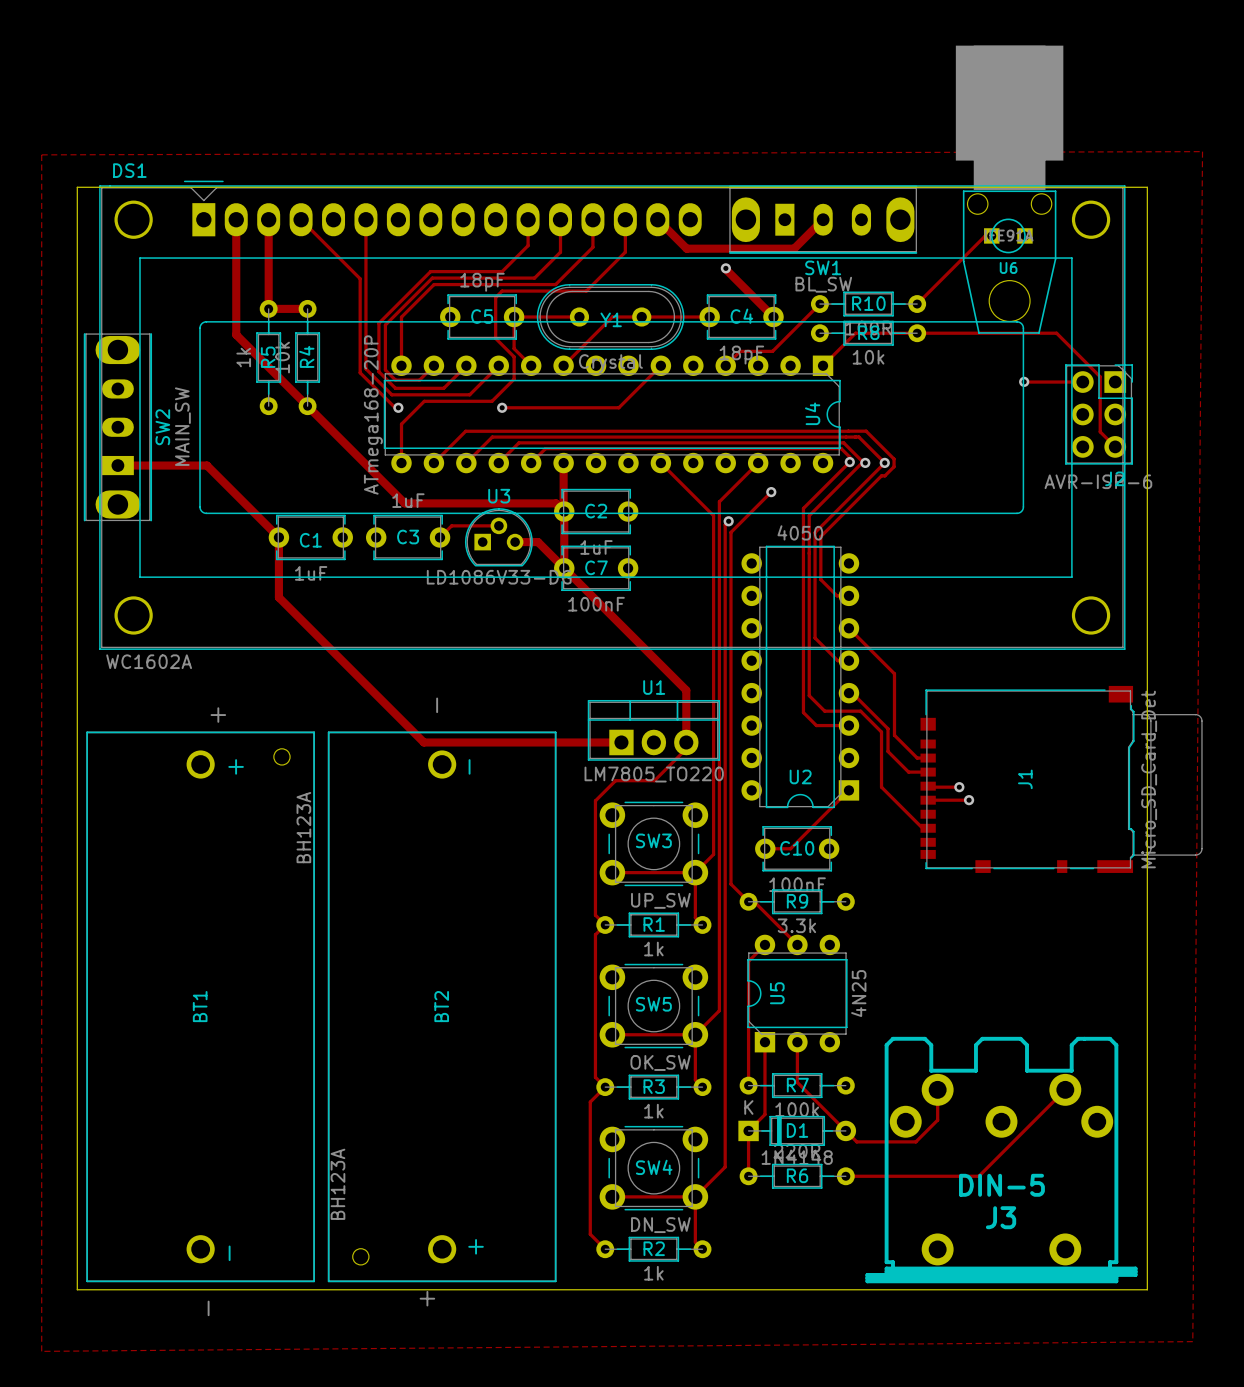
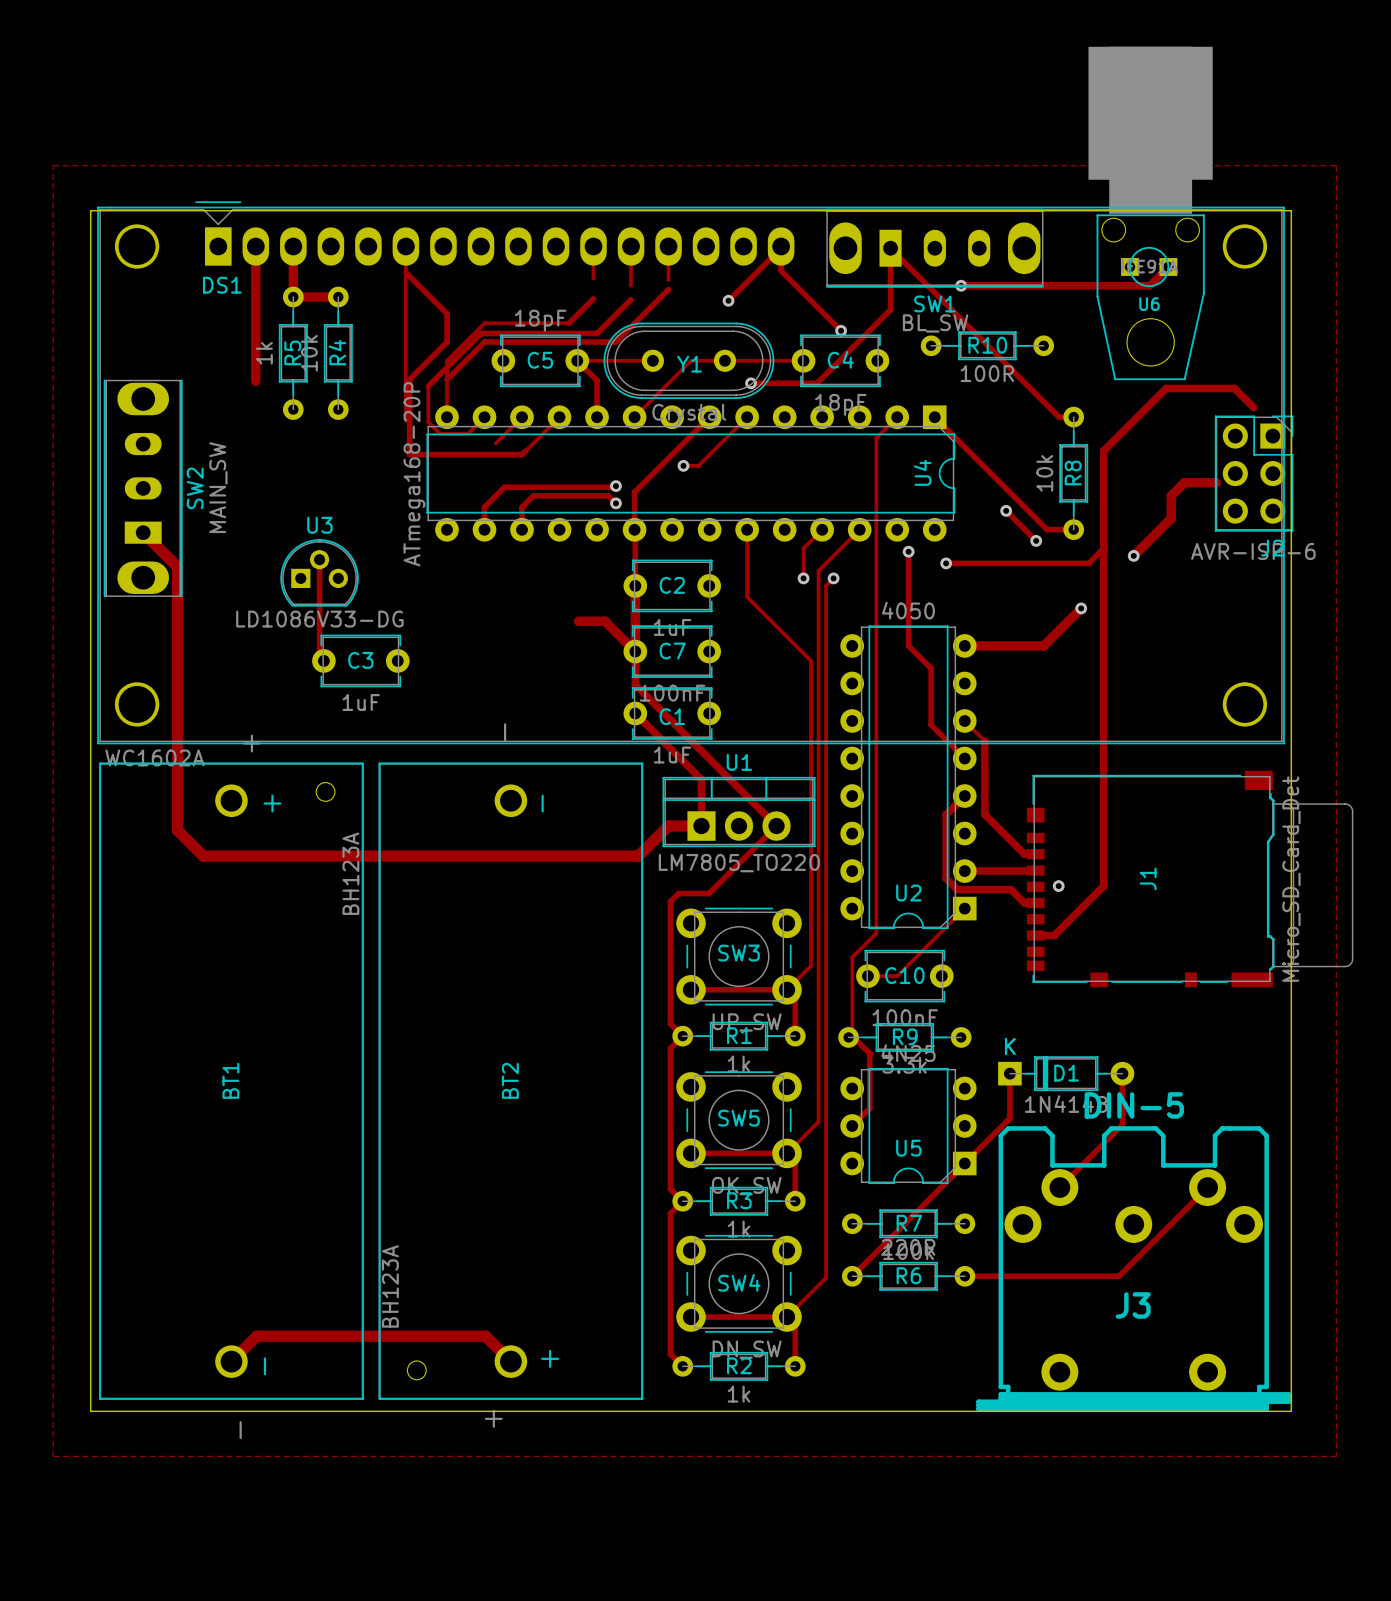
zone outline: (1202, 151) (41, 154) (41, 1351) (1192, 1341) (1202, 151) -> (53, 165) (53, 1456) (1336, 1456) (1336, 165) (53, 165)
DS1 name position: DS1 (129, 170) -> DS1 (222, 285)
DS1 footprint: [99, 180, 1126, 650] -> [97, 201, 1285, 745]
board edge: (93, 187) (77, 187) (77, 1289) (1147, 1289) (1147, 187) (1131, 187) -> (90, 210) (90, 1411) (1291, 1411) (1291, 210)
track: none -> (781, 246) (781, 270) (841, 330)
track: (301, 219) (360, 278) (360, 372) (395, 407) (398, 407) -> none
track: (625, 219) (625, 252) (586, 291) (502, 291) (495, 297) (495, 338) (514, 356) (514, 379) (492, 401) (424, 401) (401, 424) (401, 463) -> none
track: (657, 219) (686, 248) (794, 248) (823, 219) -> none
track: none -> (781, 248) (728, 300)
track: none -> (890, 248) (890, 309) (817, 383) (751, 383)
track: none -> (890, 248) (1059, 417) (1073, 417)
track: (991, 235) (985, 235) (917, 304) -> none
track: none -> (1168, 266) (1149, 285) (961, 285)
track: (528, 245) (502, 271) (430, 271) (378, 323) (378, 371) (395, 388) (443, 388) -> none
track: (592, 247) (555, 284) (507, 284) -> (593, 298) (569, 323)
track: (560, 252) (534, 278) (432, 278) (385, 325) (385, 338) -> (631, 299) (597, 333) (481, 333) (428, 386)
via: none -> (961, 285)
track: none -> (668, 289) (615, 342) (484, 342) (446, 379)
track: (268, 261) (268, 308) (307, 308) -> (293, 297) (338, 297)
via: none -> (728, 300)
track: (725, 268) (773, 317) -> none
via position: (725, 268) -> (841, 330)
track: (819, 304) (772, 351) (740, 351) (725, 365) -> none
track: (514, 317) (514, 348) (531, 365) -> (577, 360) (597, 380) (597, 417)
R8 rotation: 0° (868, 333) -> 90° clockwise (1073, 473)
R8 position: (868, 333) -> (1073, 473)
track: (236, 334) (404, 503) (556, 503) (564, 511) (563, 463) -> none
via: none -> (751, 383)
R5 position: (268, 357) -> (293, 353)
R4 position: (307, 357) -> (338, 353)
track: none -> (1253, 407) (1234, 388) (1166, 388) (1103, 450) (1103, 886) (1054, 935) (1035, 935)
track: none -> (709, 417) (634, 492) (635, 585)
track: none -> (897, 417) (876, 438) (876, 933) (852, 957) (852, 1036) (869, 1053) (869, 1108) (852, 1125)
track: (823, 365) (855, 333) (1056, 333) (1100, 376) (1100, 431) (1115, 446) -> (934, 417) (1047, 529) (1073, 529)
track: (365, 368) (391, 394) (469, 394) -> (405, 272) (447, 313) (447, 342) (409, 379) (409, 454) (522, 454) (525, 450)
track: (1024, 381) (1082, 382) -> none
via: (1024, 381) -> none
via: (398, 407) -> none
track: (502, 407) (605, 407) -> none
via: (502, 407) -> none
via: none -> (683, 465)
track: none -> (1216, 482) (1184, 482) (1171, 495) (1171, 518) (1133, 555)
via: none -> (615, 486)
SW2 position: (117, 427) -> (143, 488)
track: (848, 431) (465, 431) (433, 463) -> (615, 486) (504, 487) (484, 507) (484, 529)
track: (848, 431) (866, 431) (894, 459) (894, 466) (884, 475) (881, 475) (820, 536) (820, 579) (837, 595) (848, 595) -> none
track: (855, 436) (858, 436) (884, 462) (815, 532) (815, 638) (837, 660) (848, 660) -> (908, 551) (908, 645) (931, 668) (931, 724) (964, 758)
track: (855, 437) (492, 437) (466, 463) -> (615, 503) (608, 495) (533, 495) (522, 507) (522, 529)
via: none -> (615, 503)
track: none -> (1006, 510) (1036, 540)
via: none -> (1006, 510)
via: (849, 462) -> none
track: (863, 462) (843, 442) (518, 442) (498, 463) -> none
track: (865, 462) (862, 462) (809, 515) (809, 695) (824, 711) (860, 711) (881, 732) (881, 787) (922, 828) (928, 828) -> none
via: (865, 462) -> none
via: (884, 462) -> none
track: (531, 463) (545, 448) (841, 448) (849, 457) (849, 462) (803, 508) (803, 712) (816, 725) (848, 725) -> none
track: (660, 463) (713, 515) (713, 854) (695, 872) -> (747, 529) (747, 597) (811, 660) (811, 965) (787, 989)
track: none -> (822, 529) (803, 548) (803, 578)
track: (117, 465) (206, 465) (278, 537) (278, 597) (423, 742) (621, 742) -> none
track: none -> (143, 532) (177, 567) (177, 830) (203, 856) (638, 856) (668, 826) (701, 826) (701, 779) (635, 713)
via: none -> (1036, 540)
track: none -> (1103, 548) (1088, 563) (946, 563)
via: none -> (908, 551)
via: none -> (1133, 555)
track: none -> (319, 559) (319, 656) (323, 660)
track: (771, 492) (730, 532) (730, 884) (748, 901) (754, 901) (797, 944) -> none
via: (771, 492) -> none
via: none -> (946, 563)
track: (722, 498) (719, 501) (719, 1010) (695, 1034) -> (818, 570) (818, 1121) (787, 1153)
C3 value position: 1uF (408, 500) -> 1uF (361, 702)
via: none -> (803, 578)
track: none -> (833, 578) (826, 585) (826, 1277) (787, 1317)
via: none -> (833, 578)
track: (728, 521) (725, 524) (725, 1167) (695, 1196) -> none
via: (728, 521) -> none
track: (498, 525) (451, 525) (440, 537) -> none
track: none -> (1081, 608) (1043, 645) (964, 645)
via: none -> (1081, 608)
C1 position: (310, 537) -> (672, 713)
C3 position: (408, 537) -> (360, 660)
U3 position: (498, 537) -> (319, 572)
track: (564, 568) (686, 690) (686, 748) (654, 780) (615, 780) (595, 800) (595, 915) (605, 924) (595, 934) (595, 1077) (605, 1087) (590, 1102) (590, 1234) (605, 1249) -> (635, 651) (635, 684) (776, 826) (708, 893) (678, 893) (670, 901) (670, 1023) (682, 1036) (670, 1048) (670, 1188) (682, 1201) (670, 1213) (670, 1354) (682, 1366)
track: (866, 645) (894, 673) (894, 735) (917, 758) (928, 758) -> (984, 741) (984, 814) (1024, 854) (1035, 854)
track: (848, 693) (852, 693) (888, 728) (888, 751) (908, 772) (928, 772) -> (964, 796) (946, 814) (946, 878) (957, 889) (1011, 889) (1024, 903) (1035, 903)
U1 position: (653, 730) -> (739, 812)
track: none -> (1035, 870) (964, 871)
via: none -> (1058, 886)
J1 position: (1061, 779) -> (1190, 879)
track: (928, 786) (959, 787) -> none
via: (959, 787) -> none
track: (928, 800) (969, 800) -> none
via: (969, 800) -> none
SW3 position: (653, 843) -> (739, 956)
track: none -> (787, 989) (795, 998) (795, 1036)
track: (612, 872) (695, 872) -> (691, 989) (787, 989)
track: (695, 872) (695, 917) (702, 924) -> none
R1 position: (653, 924) -> (739, 1036)
track: none -> (1009, 1073) (1009, 1118) (852, 1276)
track: none -> (1122, 1073) (1122, 1124) (1059, 1187)
track: (764, 944) (748, 961) (748, 1085) -> none
U5 rotation: 0° (797, 993) -> 90° counterclockwise (908, 1125)
track: none -> (787, 1153) (795, 1161) (795, 1201)
BT1 position: (200, 1006) -> (231, 1081)
BT2 position: (442, 1006) -> (510, 1081)
SW5 position: (653, 1006) -> (739, 1120)
track: none -> (1207, 1187) (1118, 1276) (964, 1276)
track: (612, 1034) (695, 1034) -> (691, 1153) (787, 1153)
track: (695, 1034) (695, 1079) (702, 1087) -> none
track: (764, 1042) (764, 1114) (748, 1130) (748, 1176) -> none
track: (797, 1042) (797, 1082) (856, 1141) (915, 1141) (937, 1120) (937, 1089) -> none
R7 position: (797, 1085) -> (908, 1223)
R3 position: (653, 1087) -> (739, 1201)
track: (1065, 1089) (978, 1176) (845, 1176) -> none
D1 position: (797, 1130) -> (1066, 1073)
track: none -> (787, 1317) (795, 1325) (795, 1366)
J3 position: (1001, 1160) -> (1133, 1268)
SW4 position: (653, 1168) -> (739, 1283)
R6 position: (797, 1176) -> (908, 1276)
track: none -> (231, 1361) (256, 1336) (485, 1336) (510, 1361)
J3 value position: DIN-5 (1001, 1185) -> DIN-5 (1134, 1105)
track: (612, 1196) (695, 1196) -> (691, 1317) (787, 1317)
track: (695, 1196) (695, 1242) (702, 1249) -> none
J3 name position: J3 (1001, 1217) -> J3 (1133, 1305)
R2 position: (653, 1249) -> (739, 1366)

